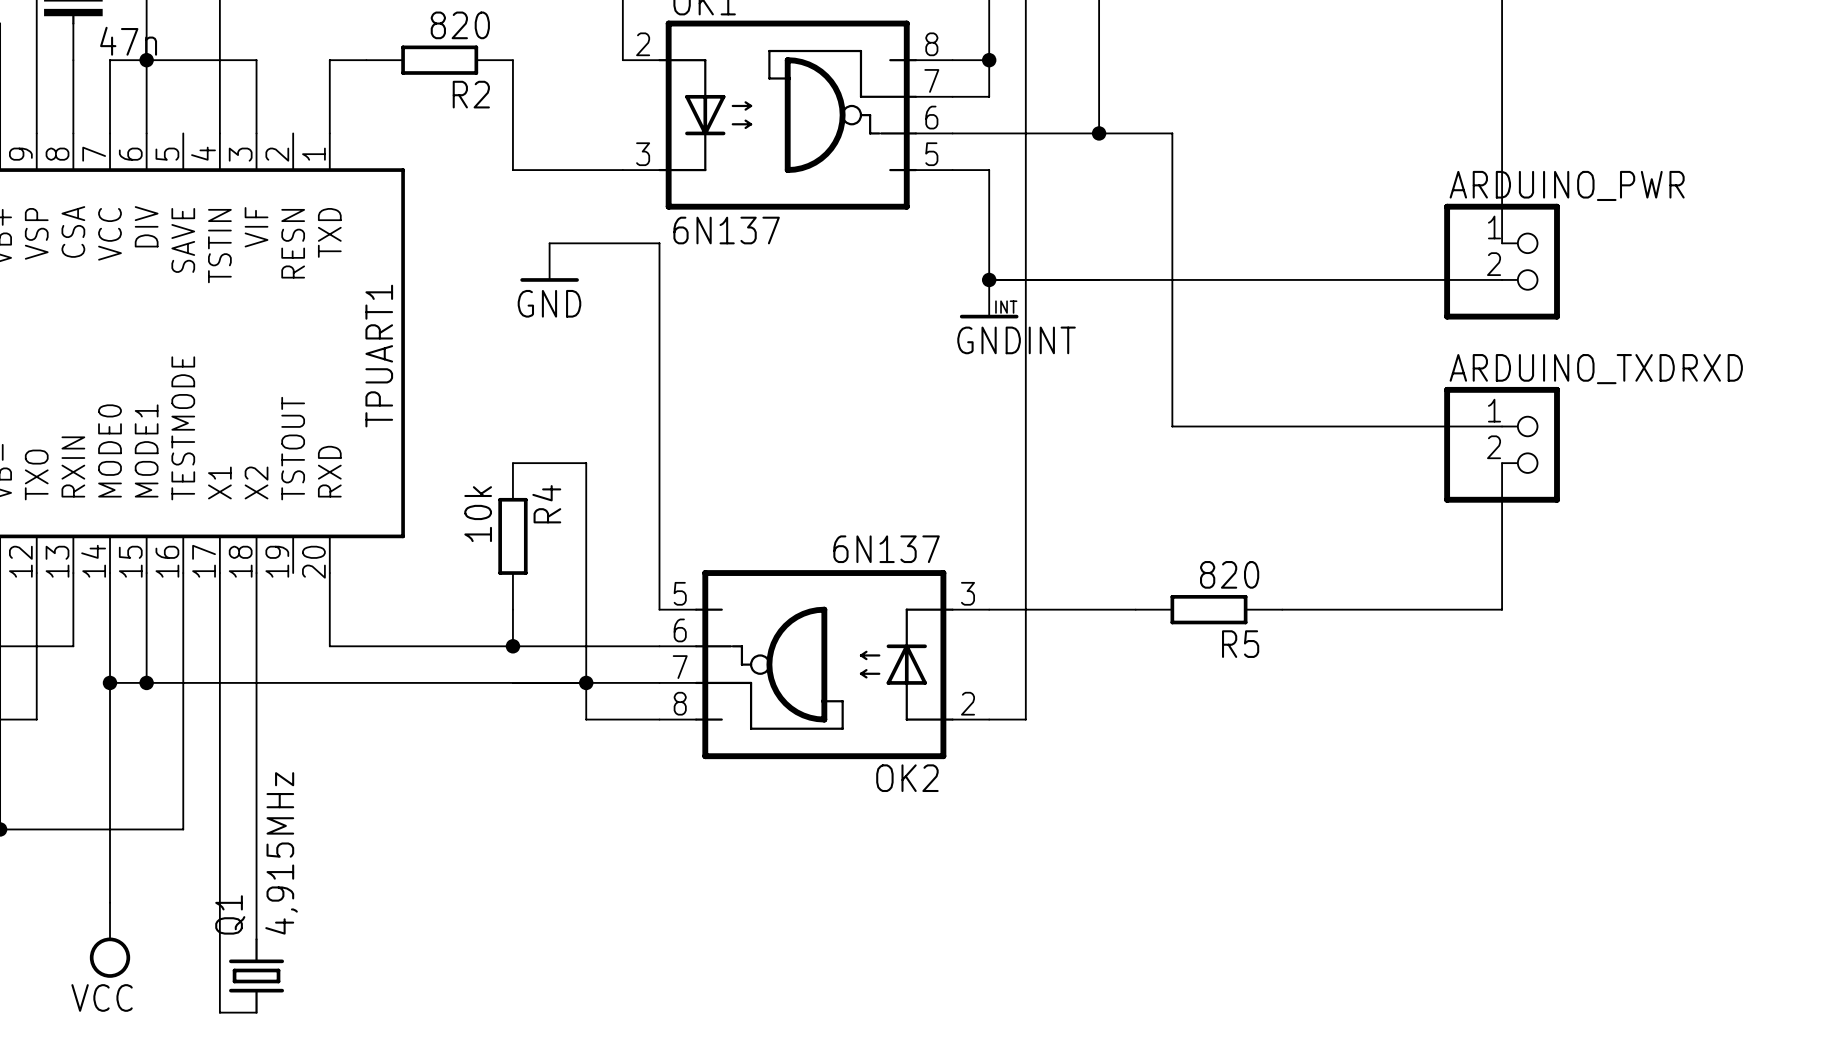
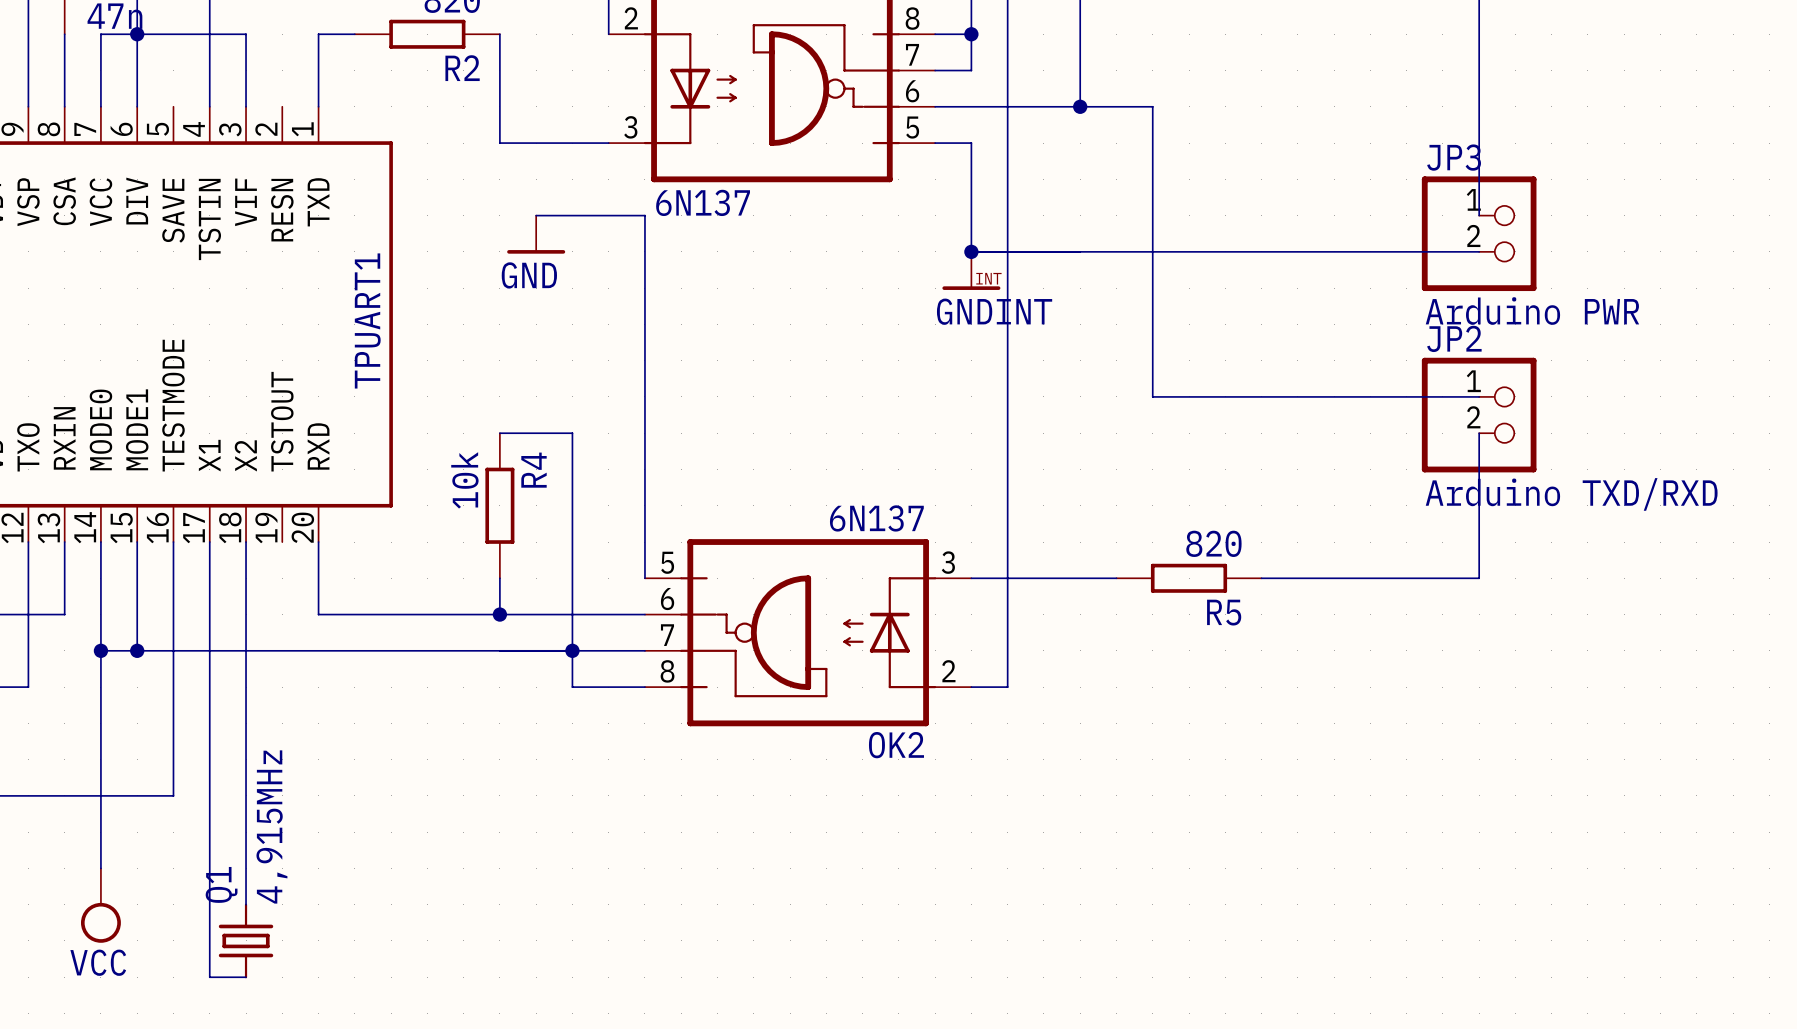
ARDUINO_PWR name: ARDUINO_PWR (1567, 185) -> JP3 (1454, 157)
ARDUINO_PWR value: none -> Arduino PWR (1532, 311)
ARDUINO_TXDRXD name: ARDUINO_TXDRXD (1596, 369) -> JP2 (1454, 338)
ARDUINO_TXDRXD value: none -> Arduino TXD/RXD (1571, 494)

